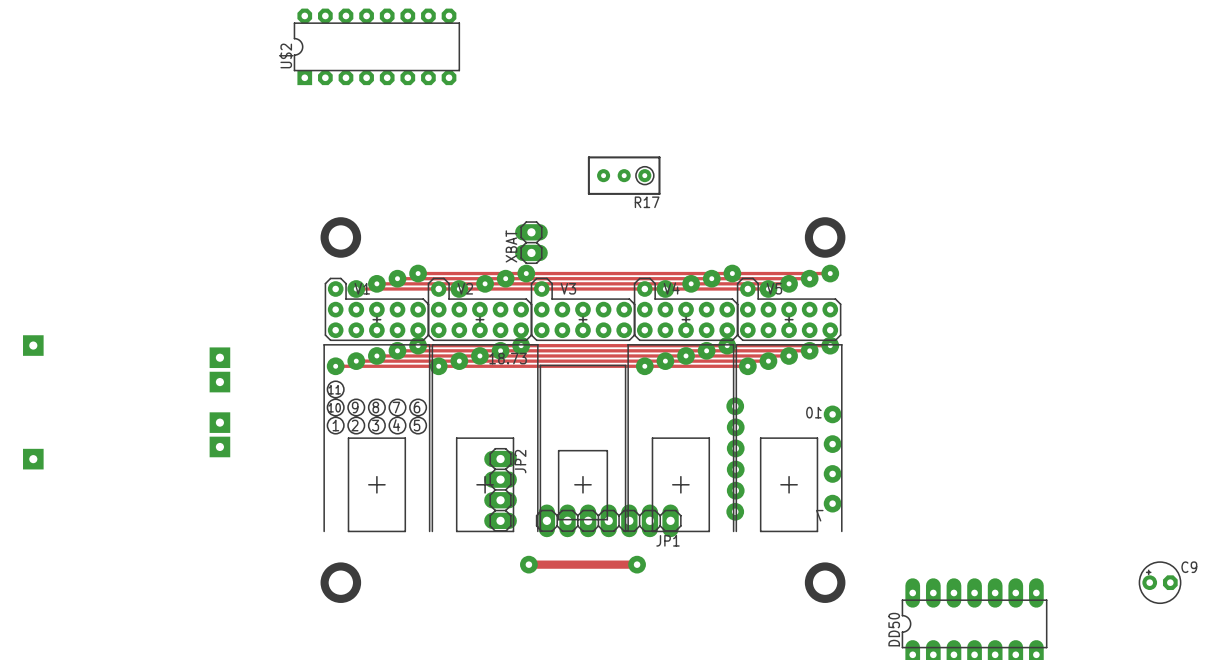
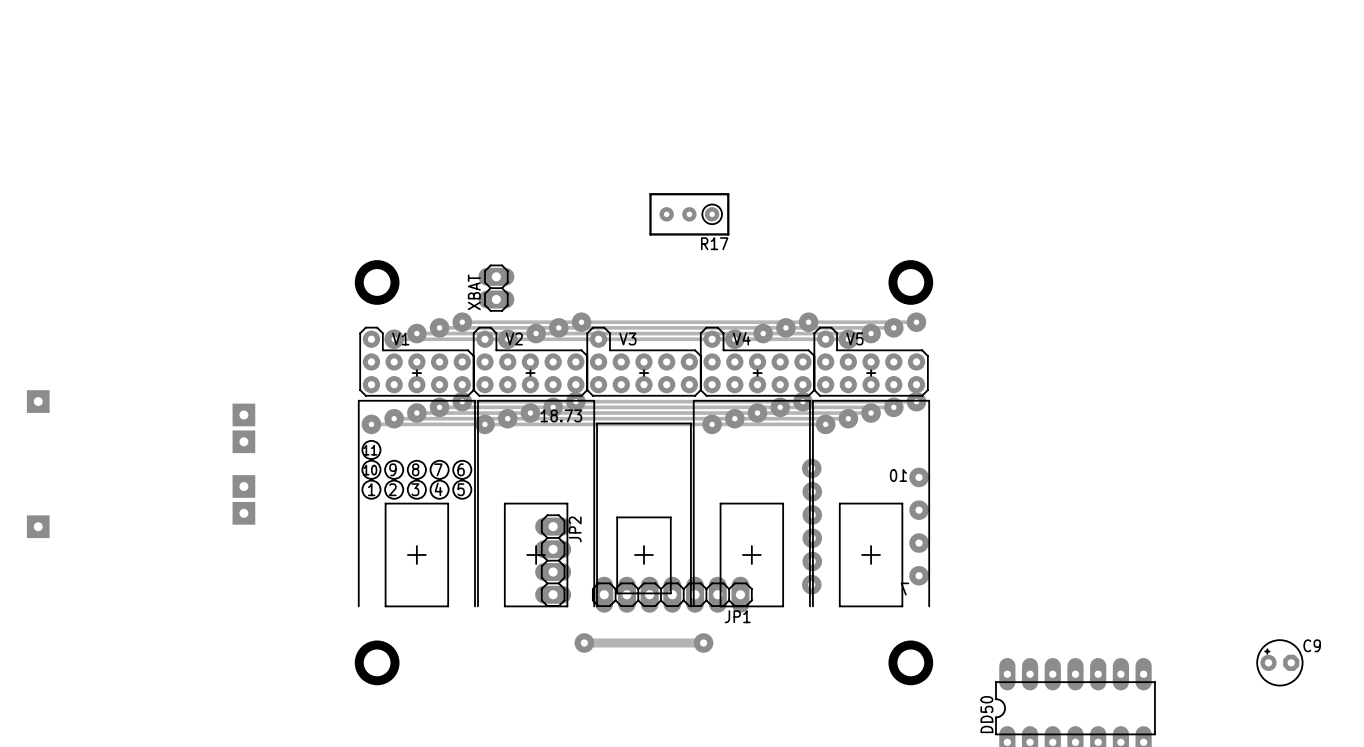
U$2: (376, 46) -> none
XBAT position: (531, 242) -> (496, 288)

